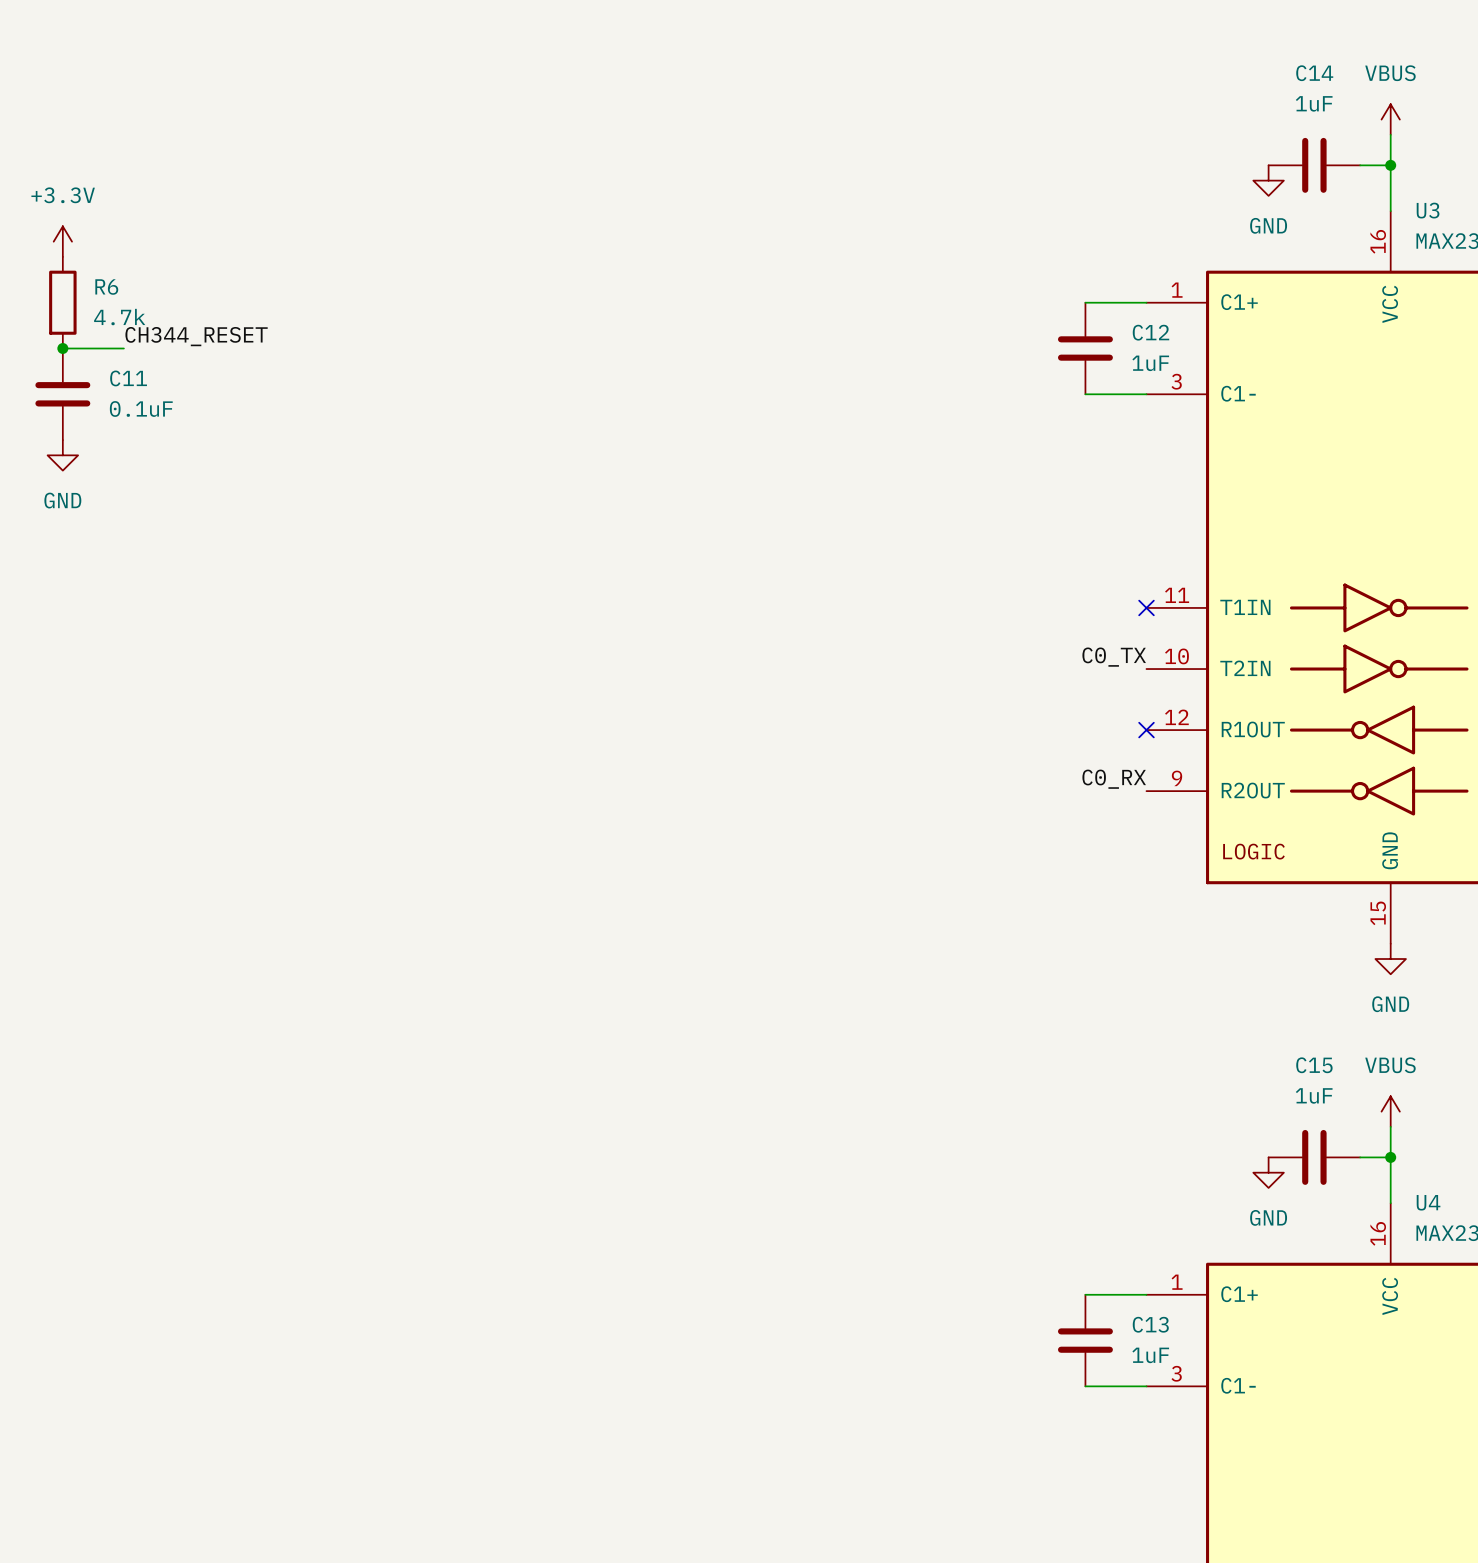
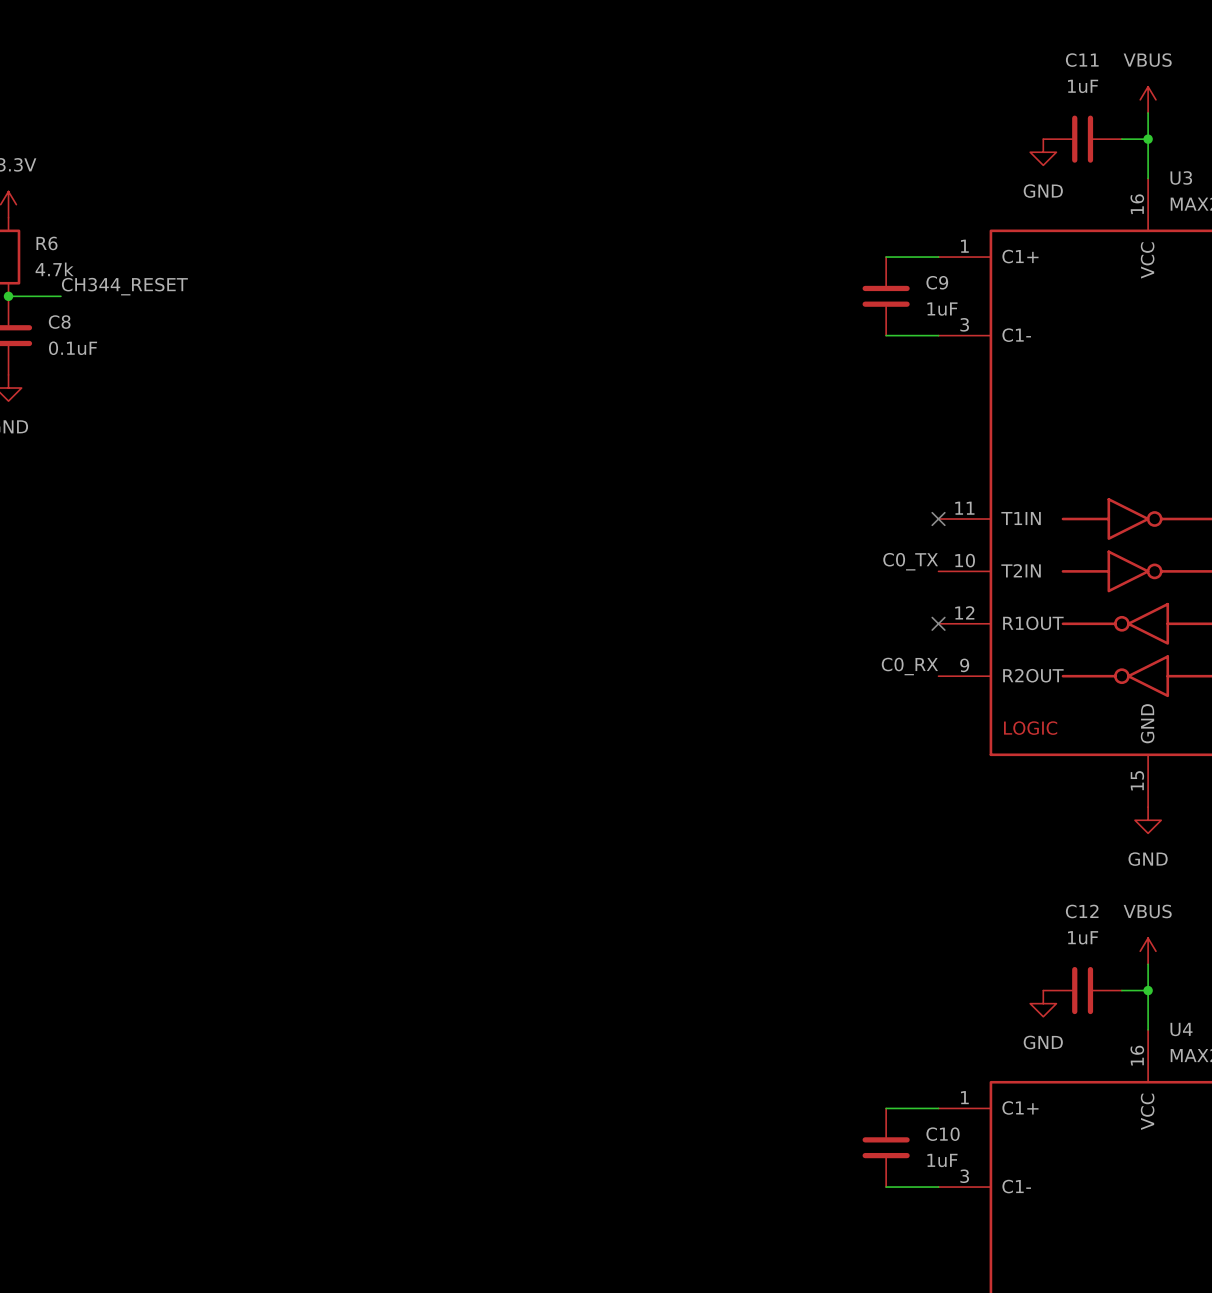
C14 name: C14 (1314, 73) -> C11 (1082, 60)
C12 name: C12 (1150, 332) -> C9 (937, 282)
C11 name: C11 (128, 378) -> C8 (59, 322)
C15 name: C15 (1314, 1065) -> C12 (1082, 911)
C13 name: C13 (1150, 1324) -> C10 (943, 1134)

